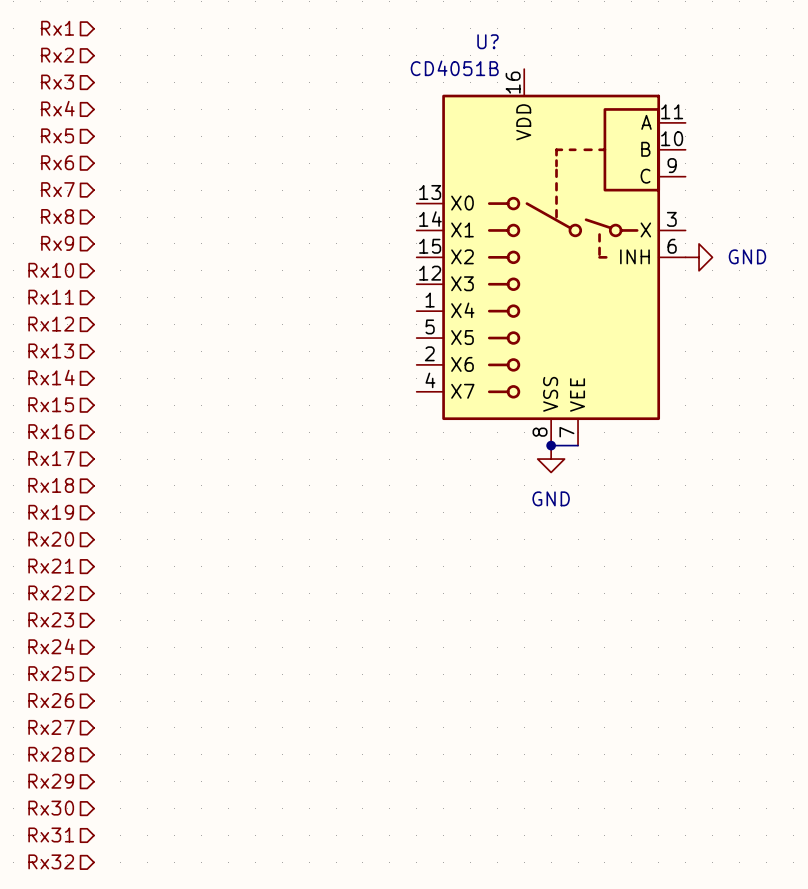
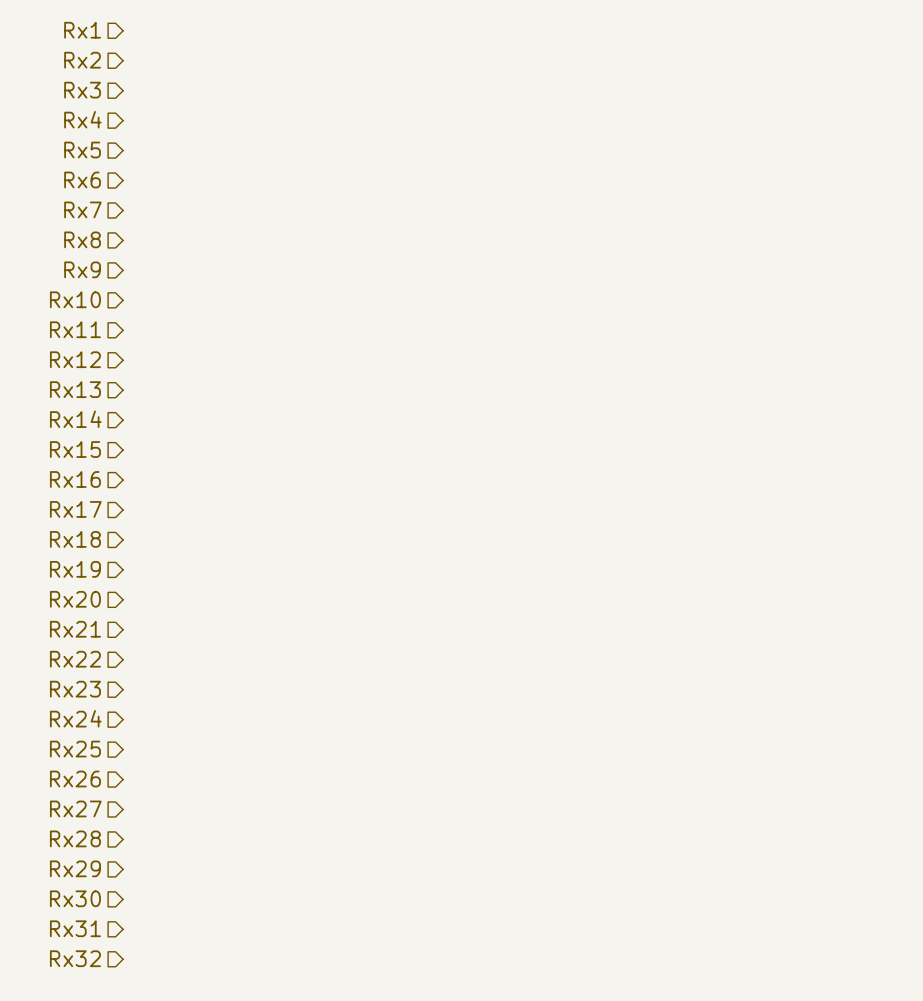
U?: CD4051B (551, 257) -> none
power symbol: GND (699, 257) -> none
wire: (551, 445) (578, 445) -> none
junction: (551, 445) -> none
power symbol: GND (551, 459) -> none

